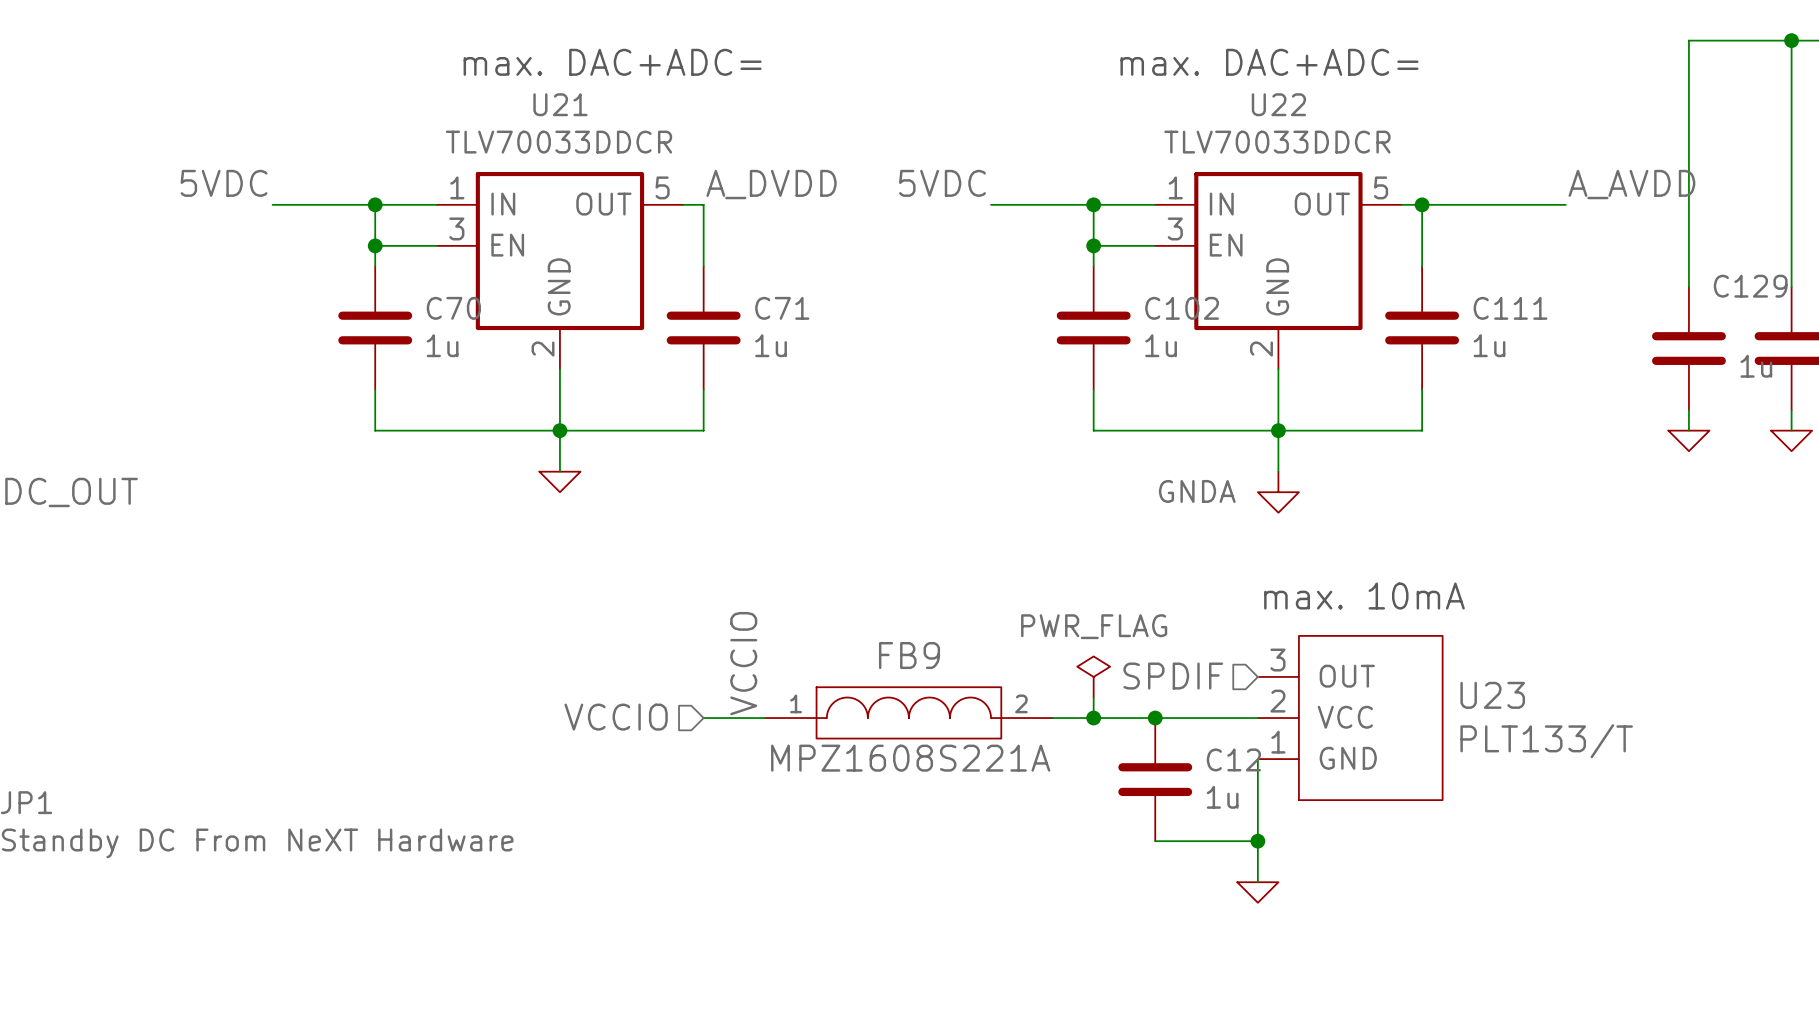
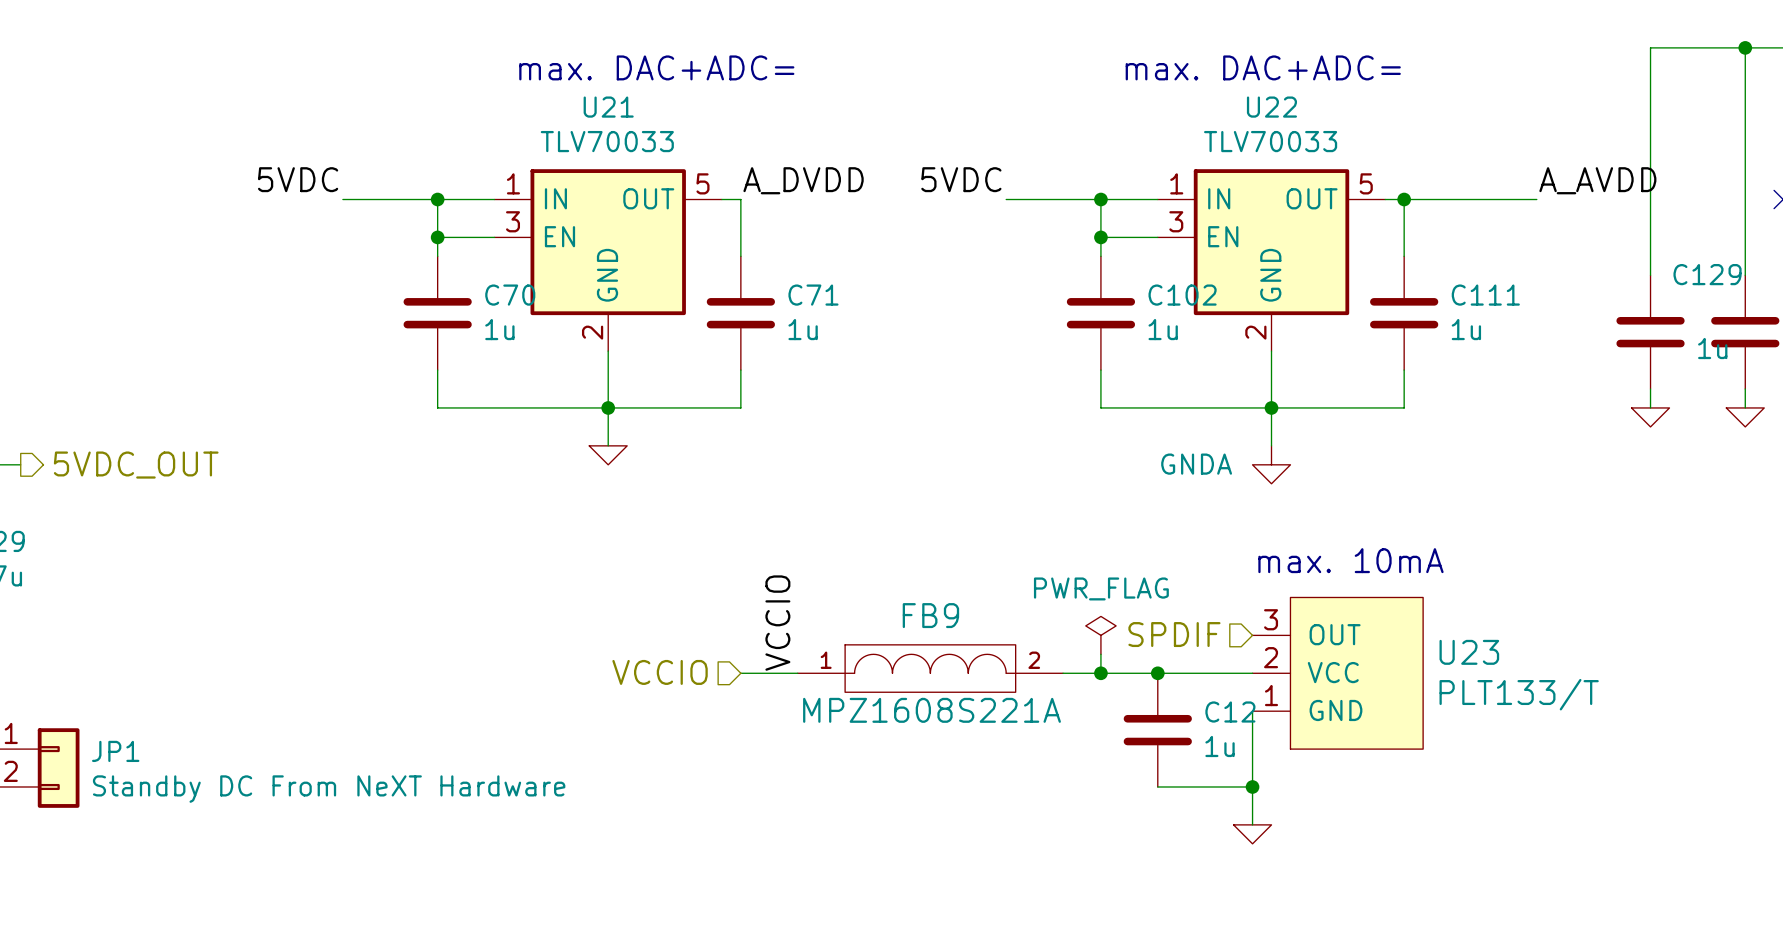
U21 value: TLV70033DDCR (558, 142) -> TLV70033 (607, 141)
U22 value: TLV70033DDCR (1277, 142) -> TLV70033 (1270, 141)

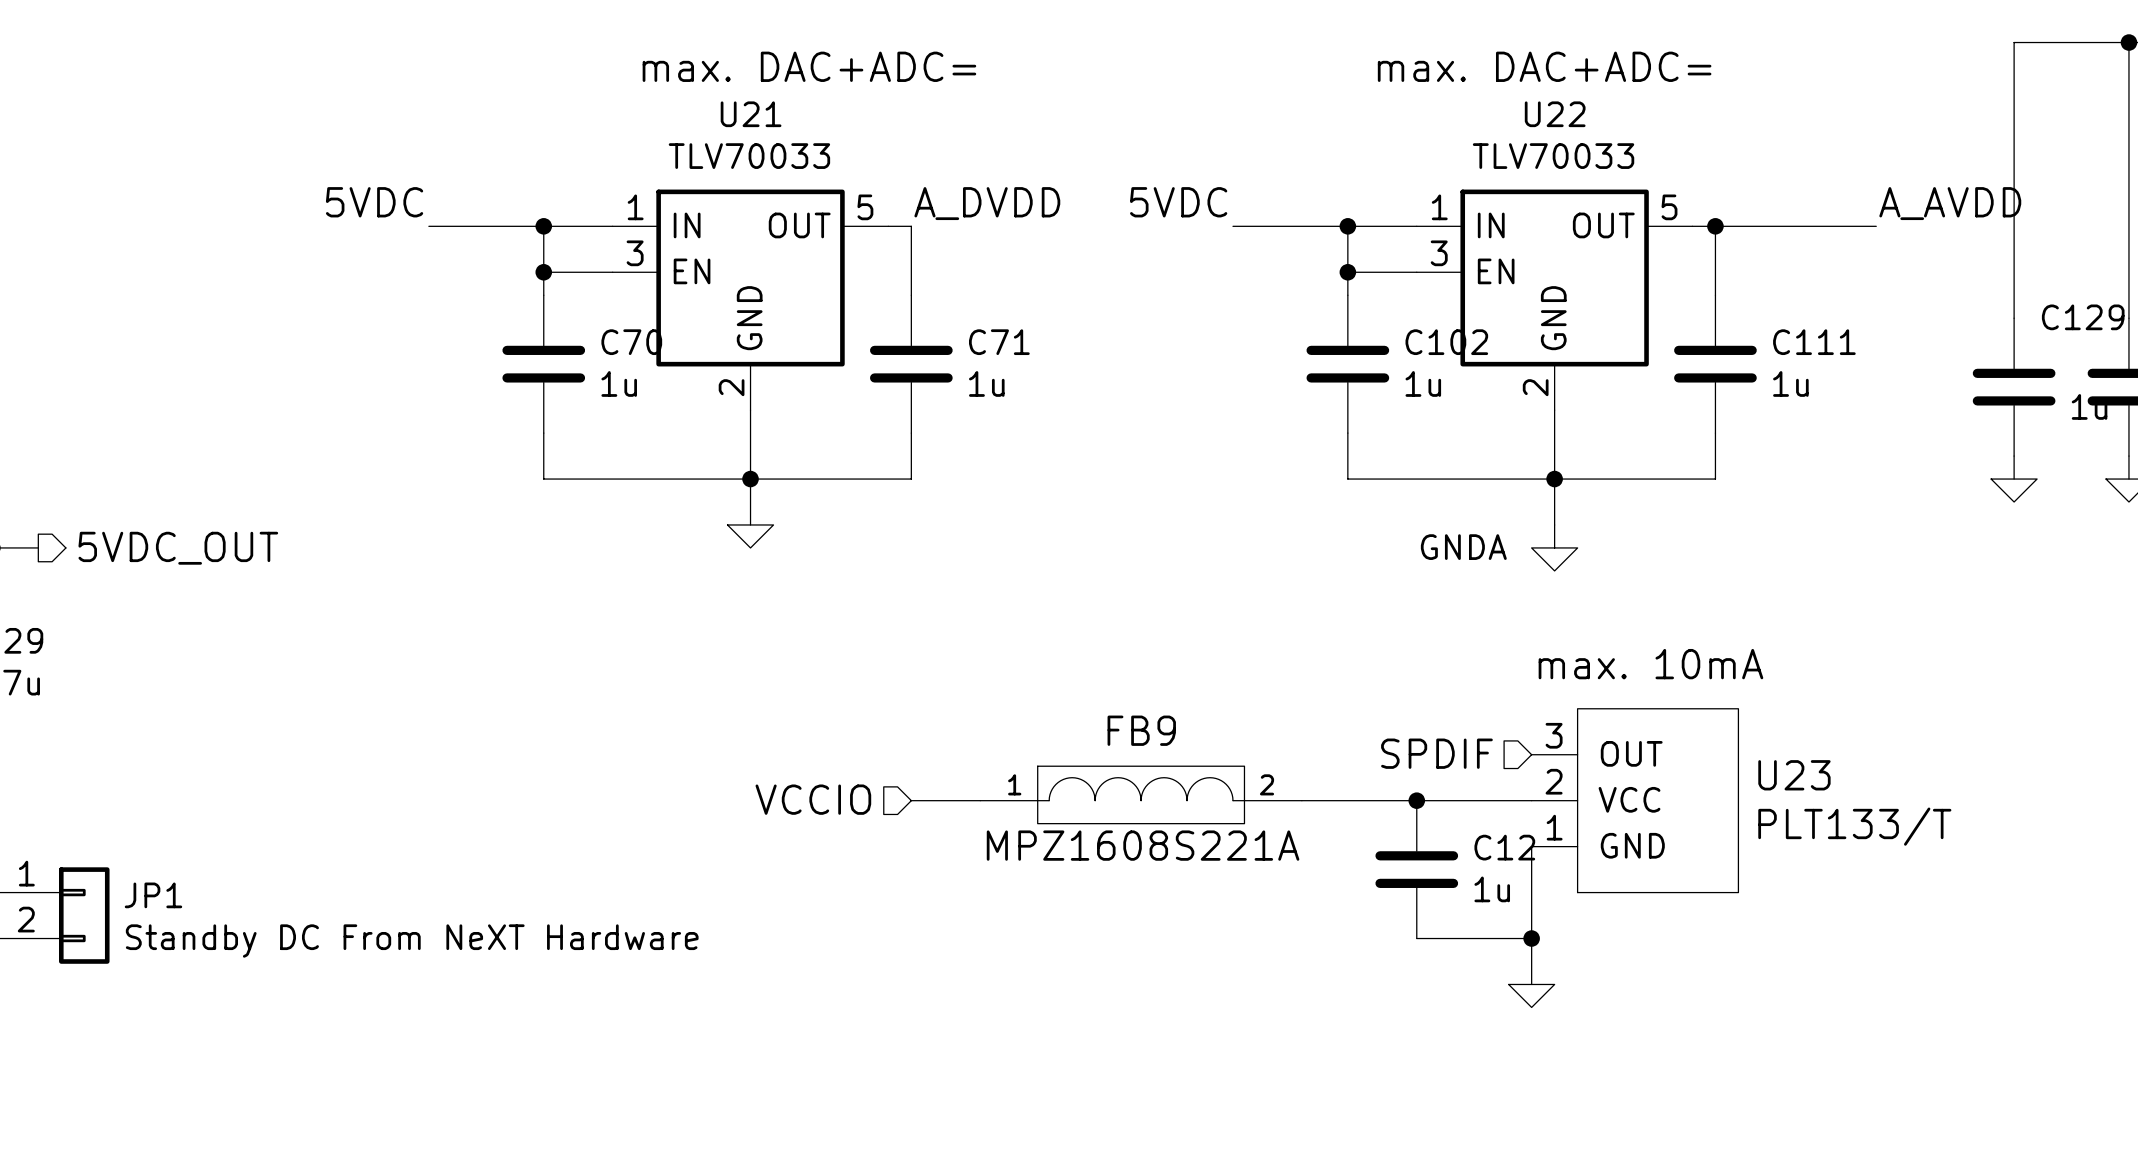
label: VCCIO (777, 623) -> none
power symbol: PWR_FLAG (1100, 635) -> none
wire: (1100, 654) (1100, 673) -> none
junction: (1100, 673) -> none

